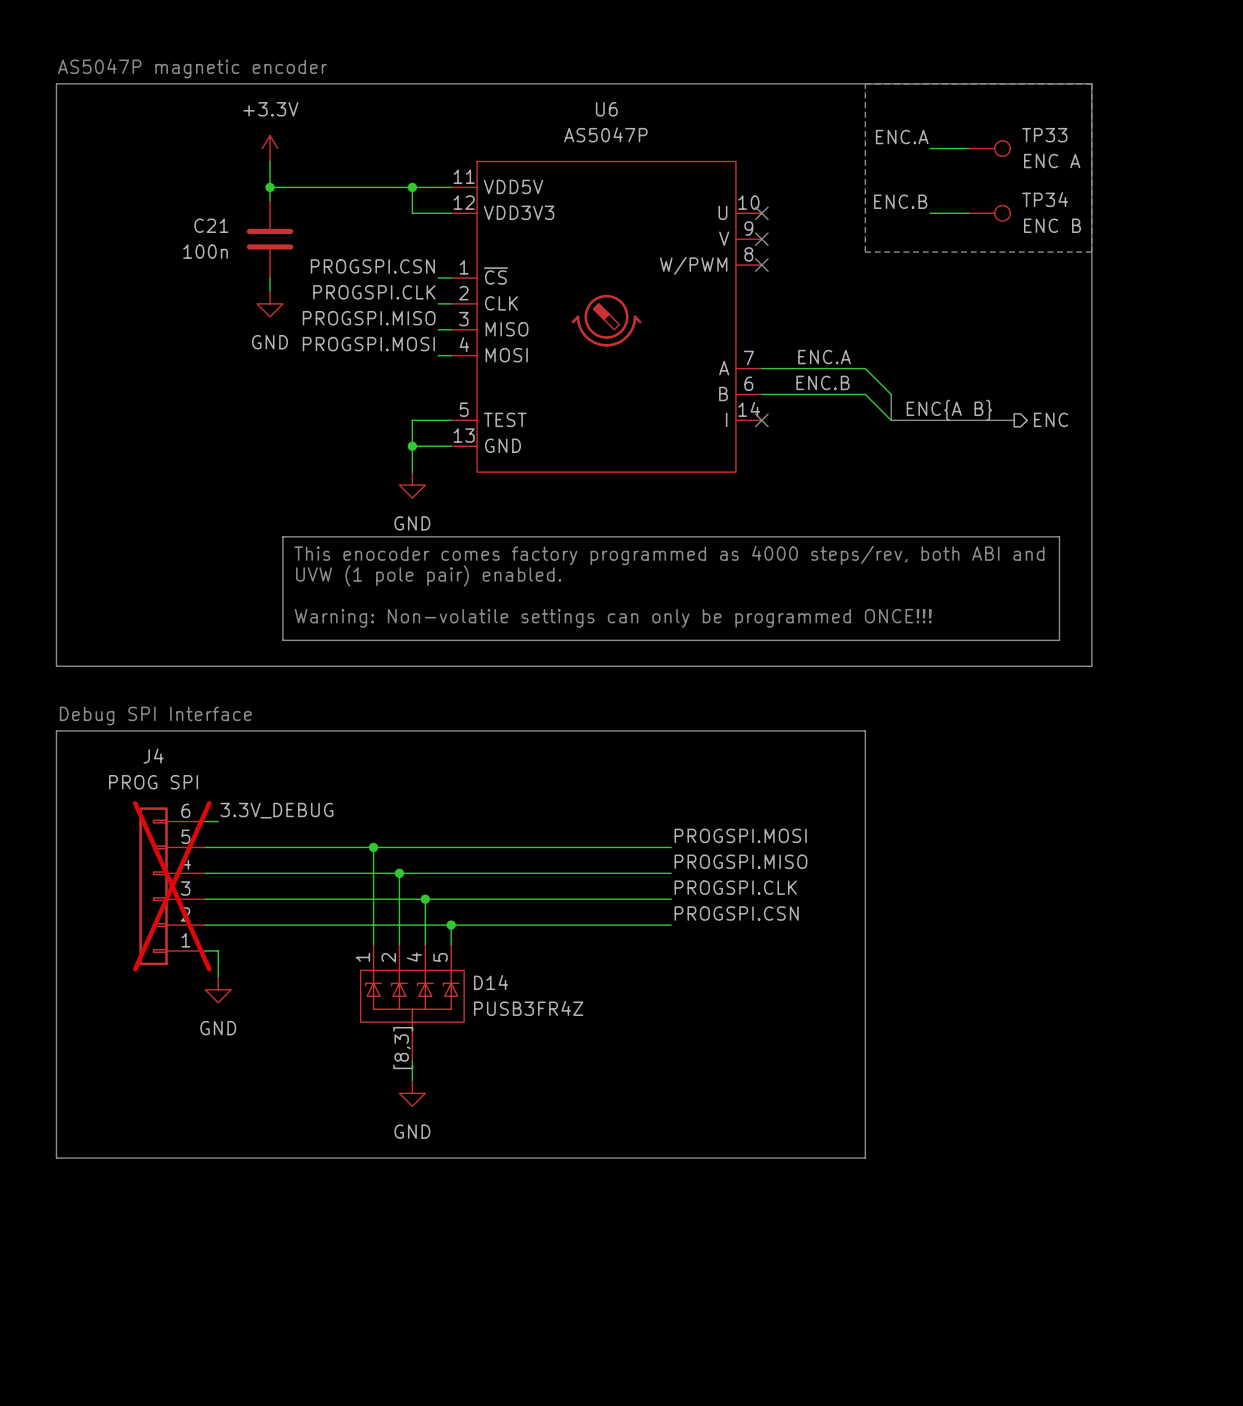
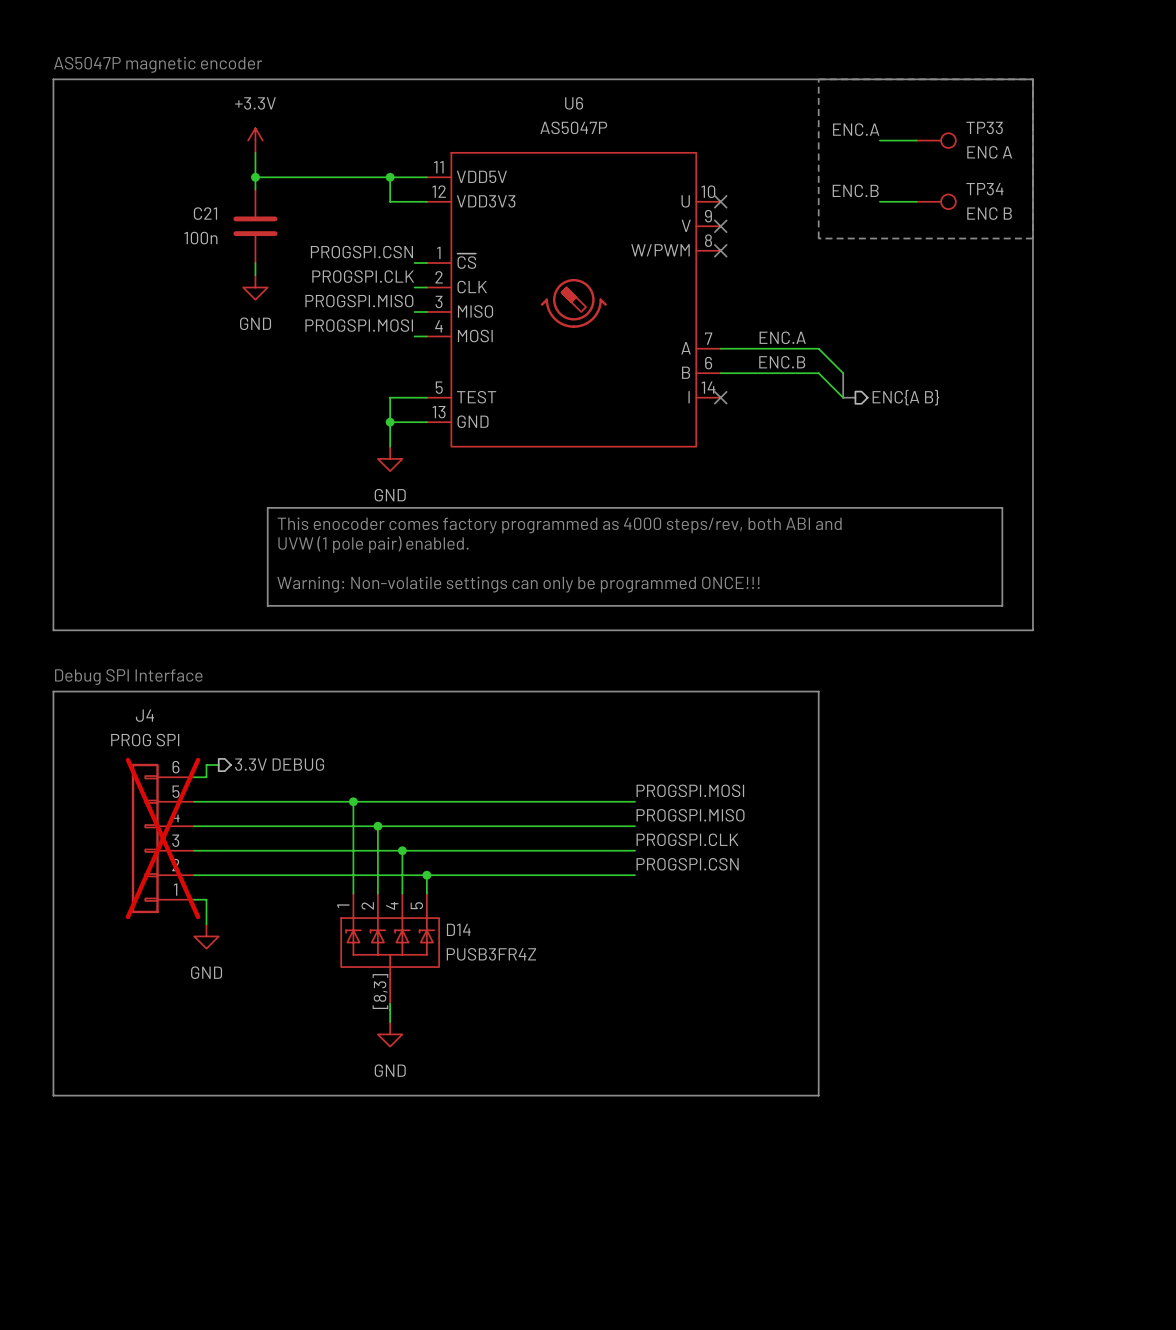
label: ENC{A B} (949, 410) -> none
hierarchical label: ENC (1051, 419) -> none
bus: (904, 420) (1014, 420) -> none
hierarchical label: none -> ENC{A B} (905, 397)
wire: none -> (218, 765) (206, 765) (206, 777)
hierarchical label: none -> 3.3V DEBUG (279, 764)
label: 3.3V_DEBUG (276, 810) -> none

